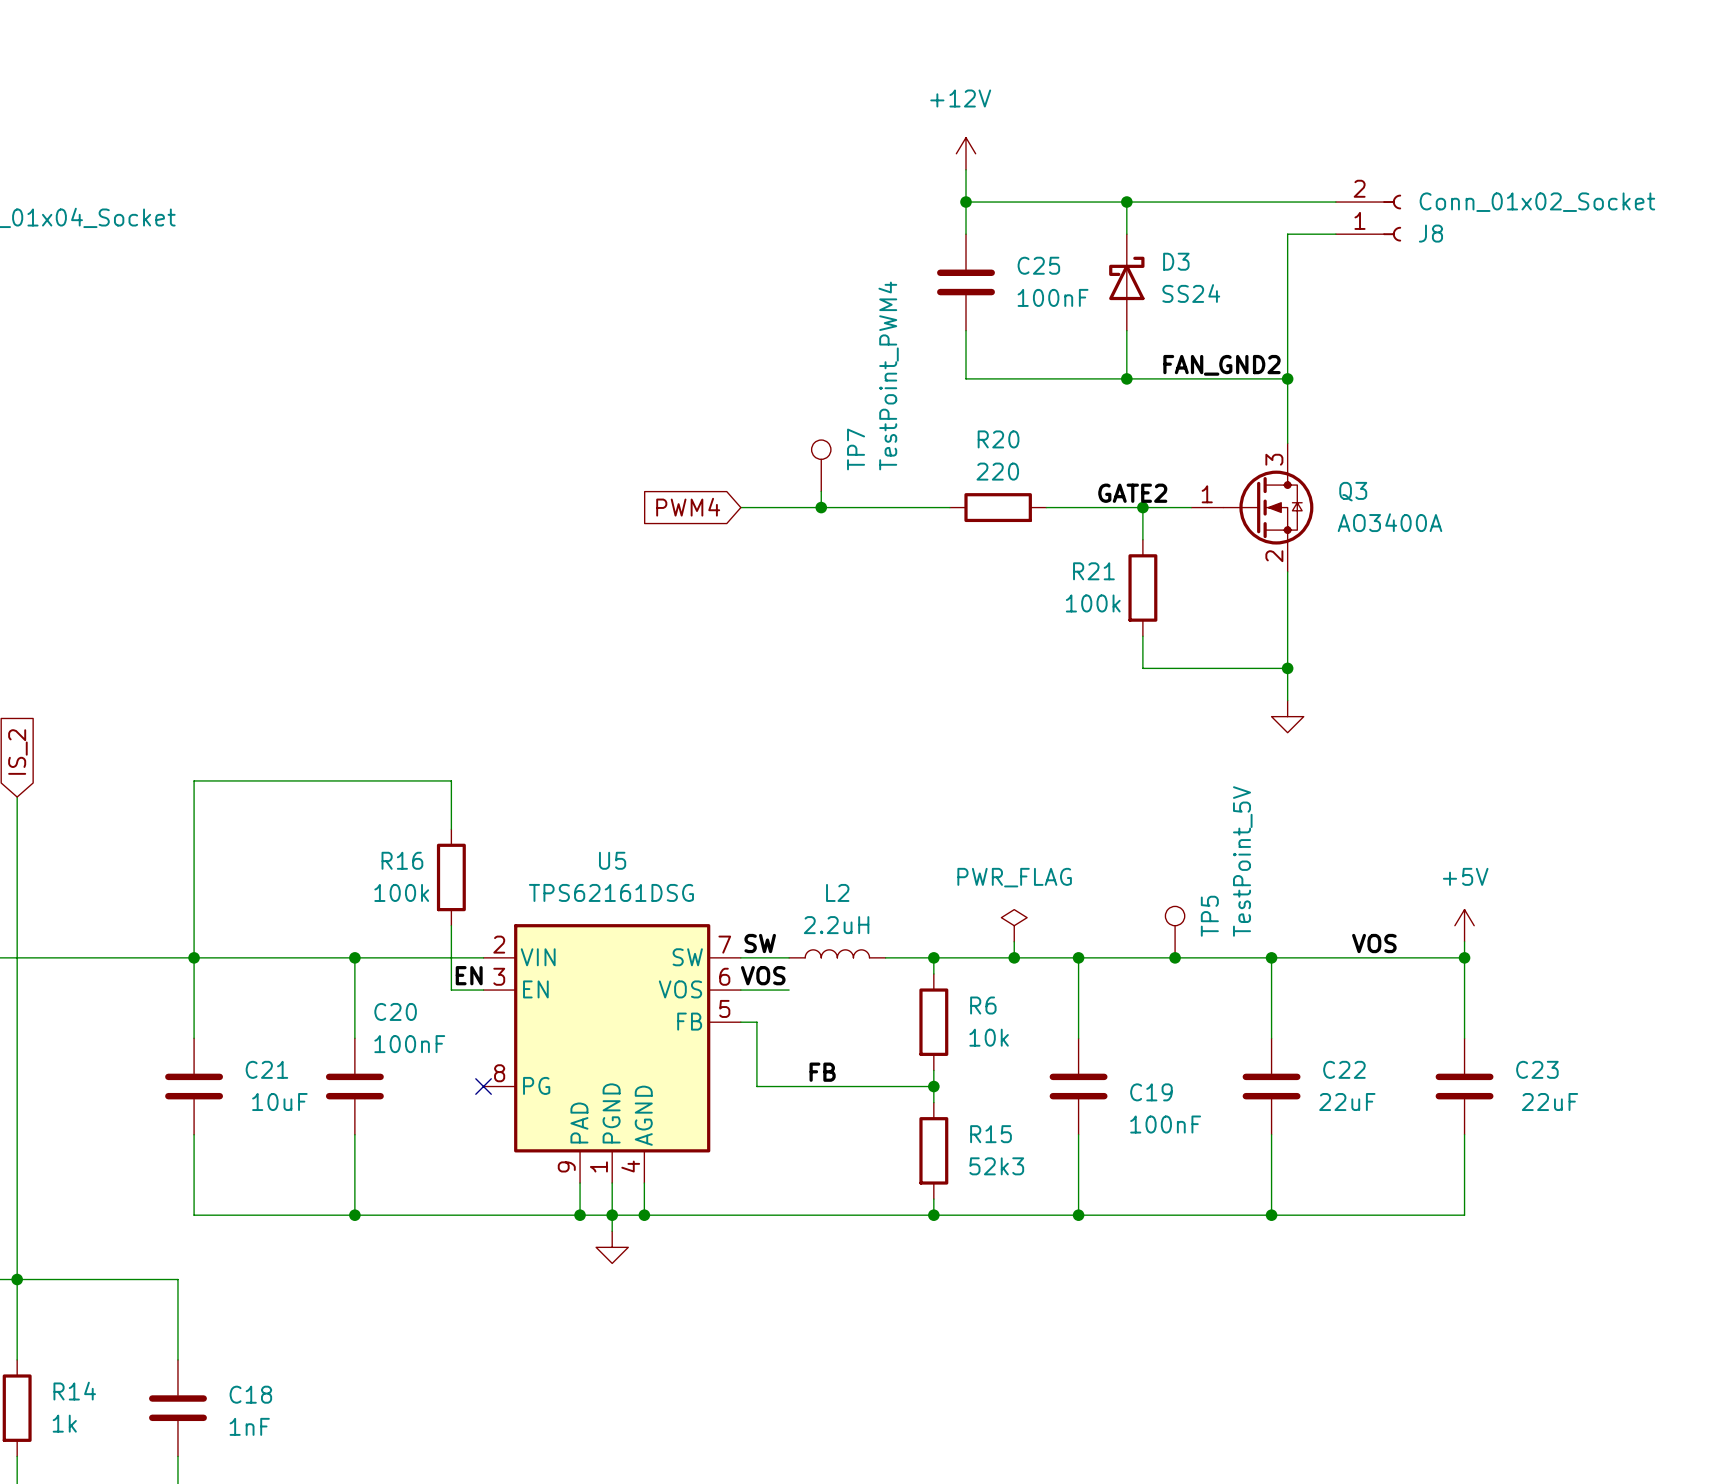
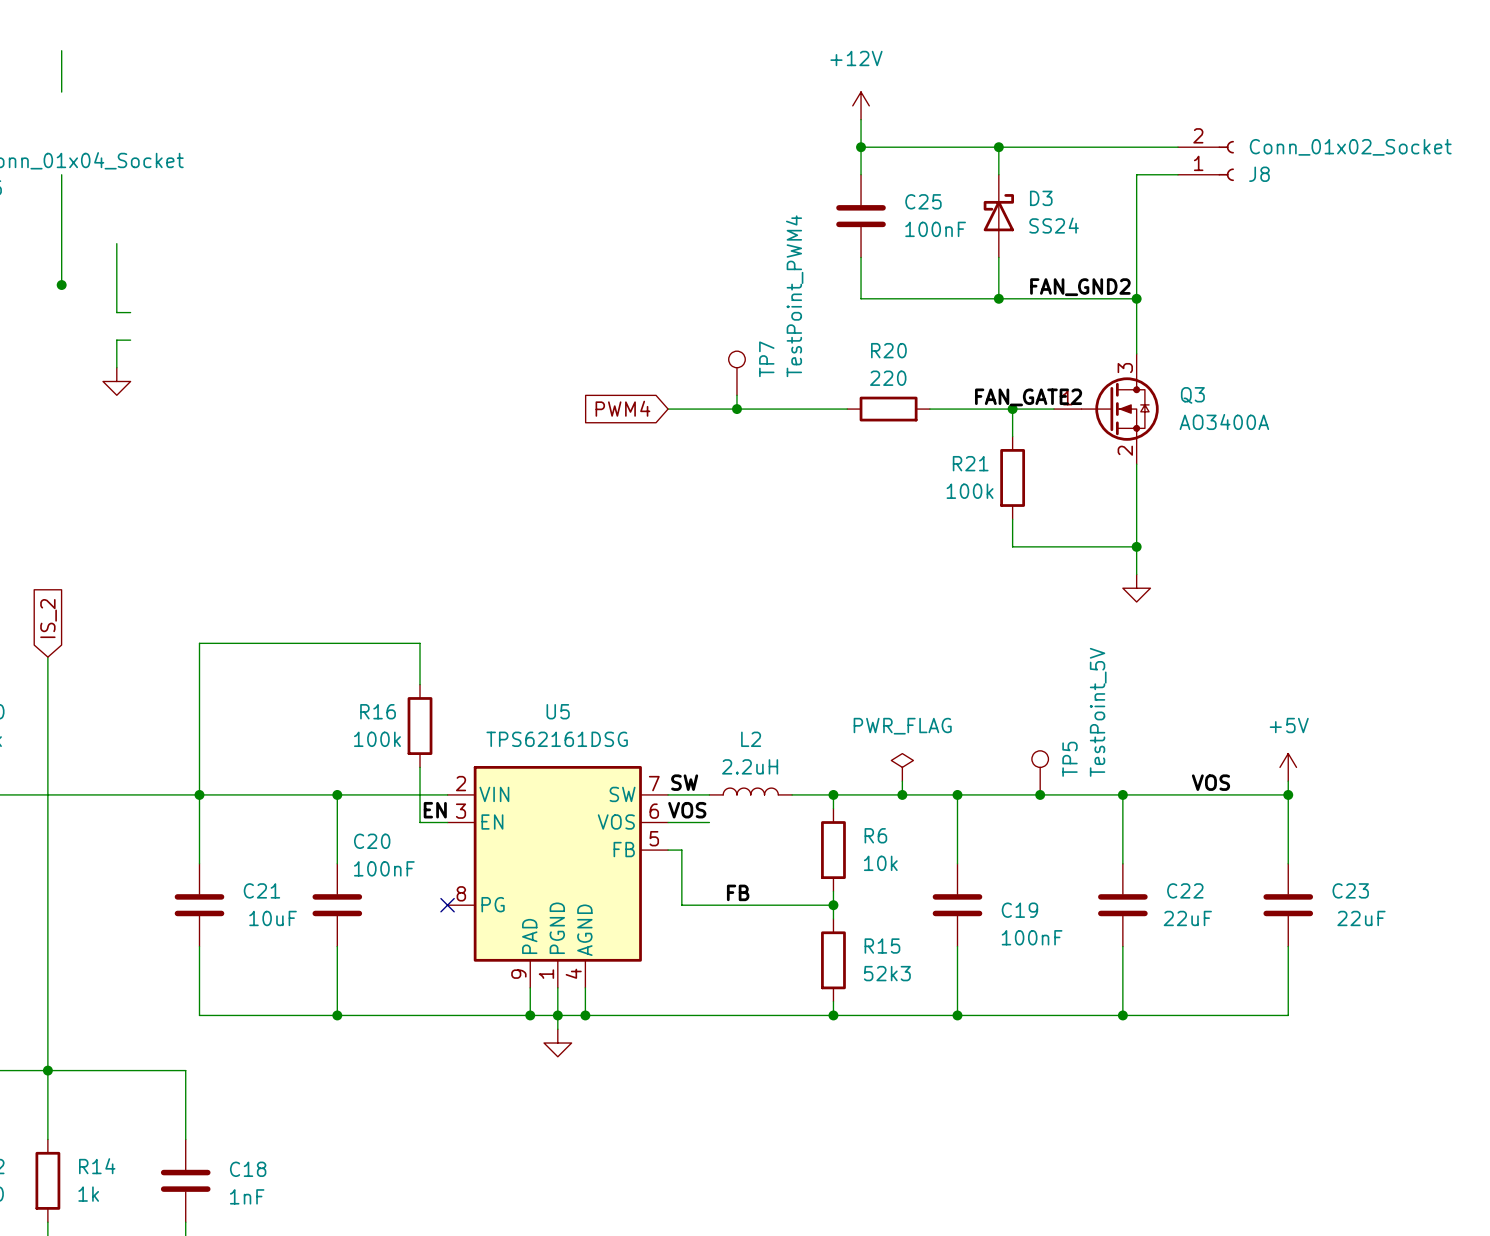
wire: none -> (61, 50) (61, 92)
wire: none -> (61, 174) (61, 285)
wire: none -> (116, 243) (116, 312) (130, 312)
junction: none -> (61, 285)
wire: none -> (130, 340) (116, 340) (116, 367)
power symbol: none -> (116, 381)
label: GATE2 (1132, 493) -> FAN_GATE2 (1028, 397)

